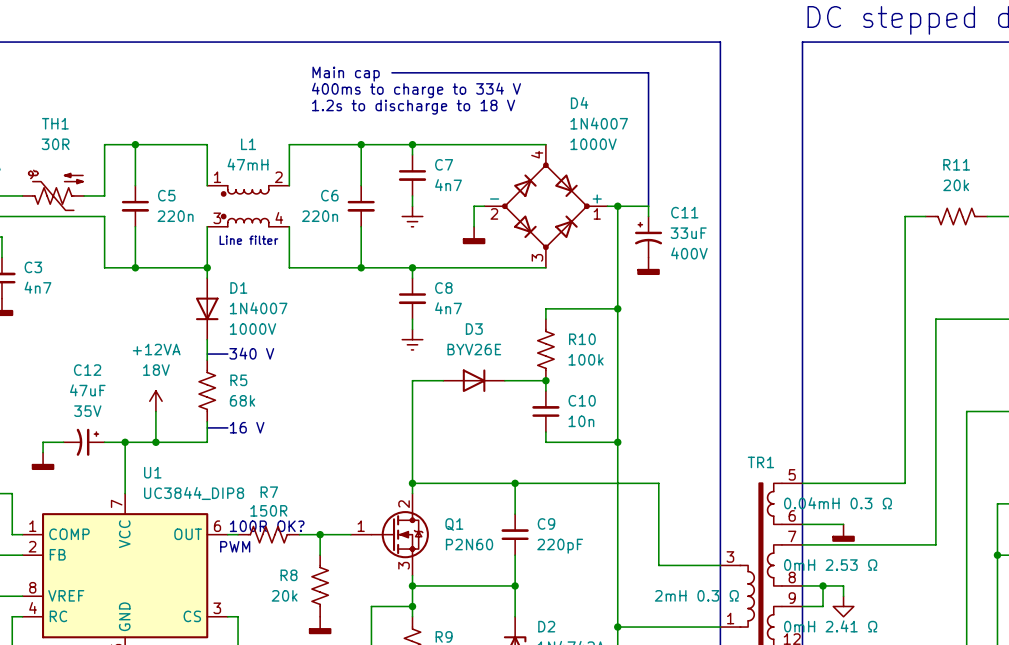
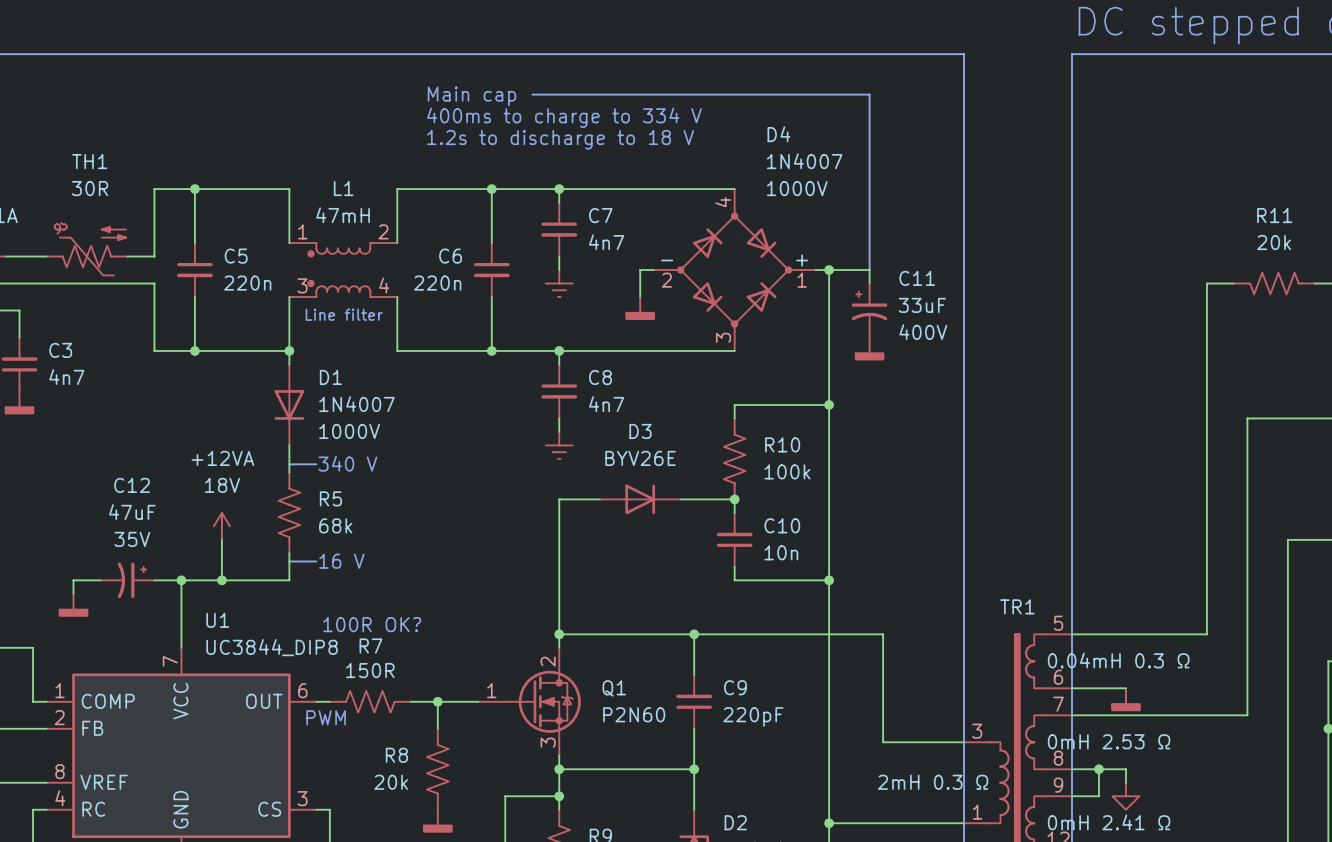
text position: 100R OK? (267, 526) -> 100R OK? (372, 624)

